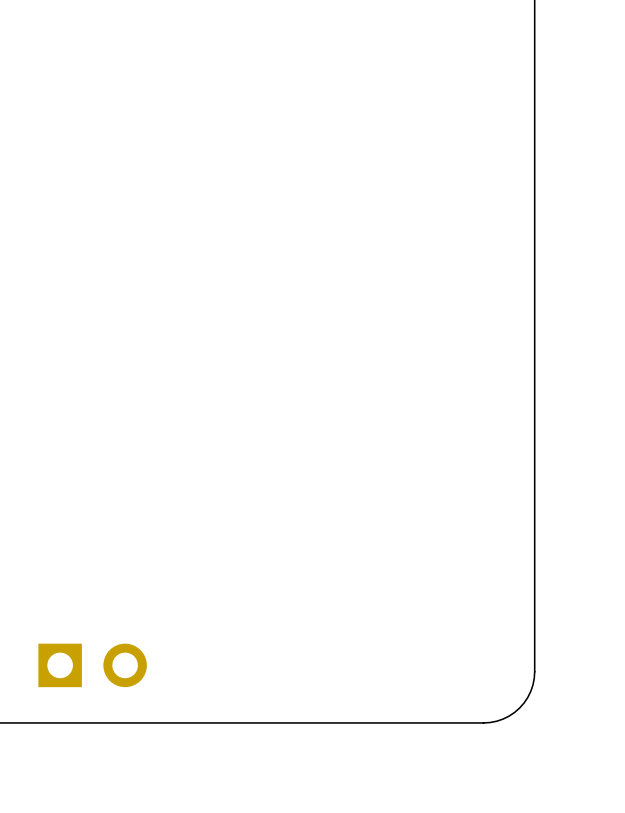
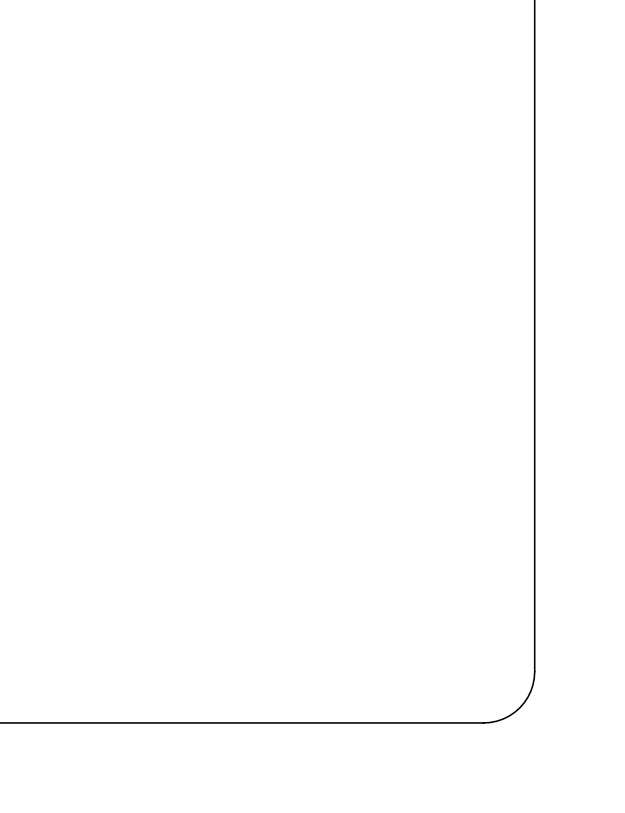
part: (92, 665) -> none

